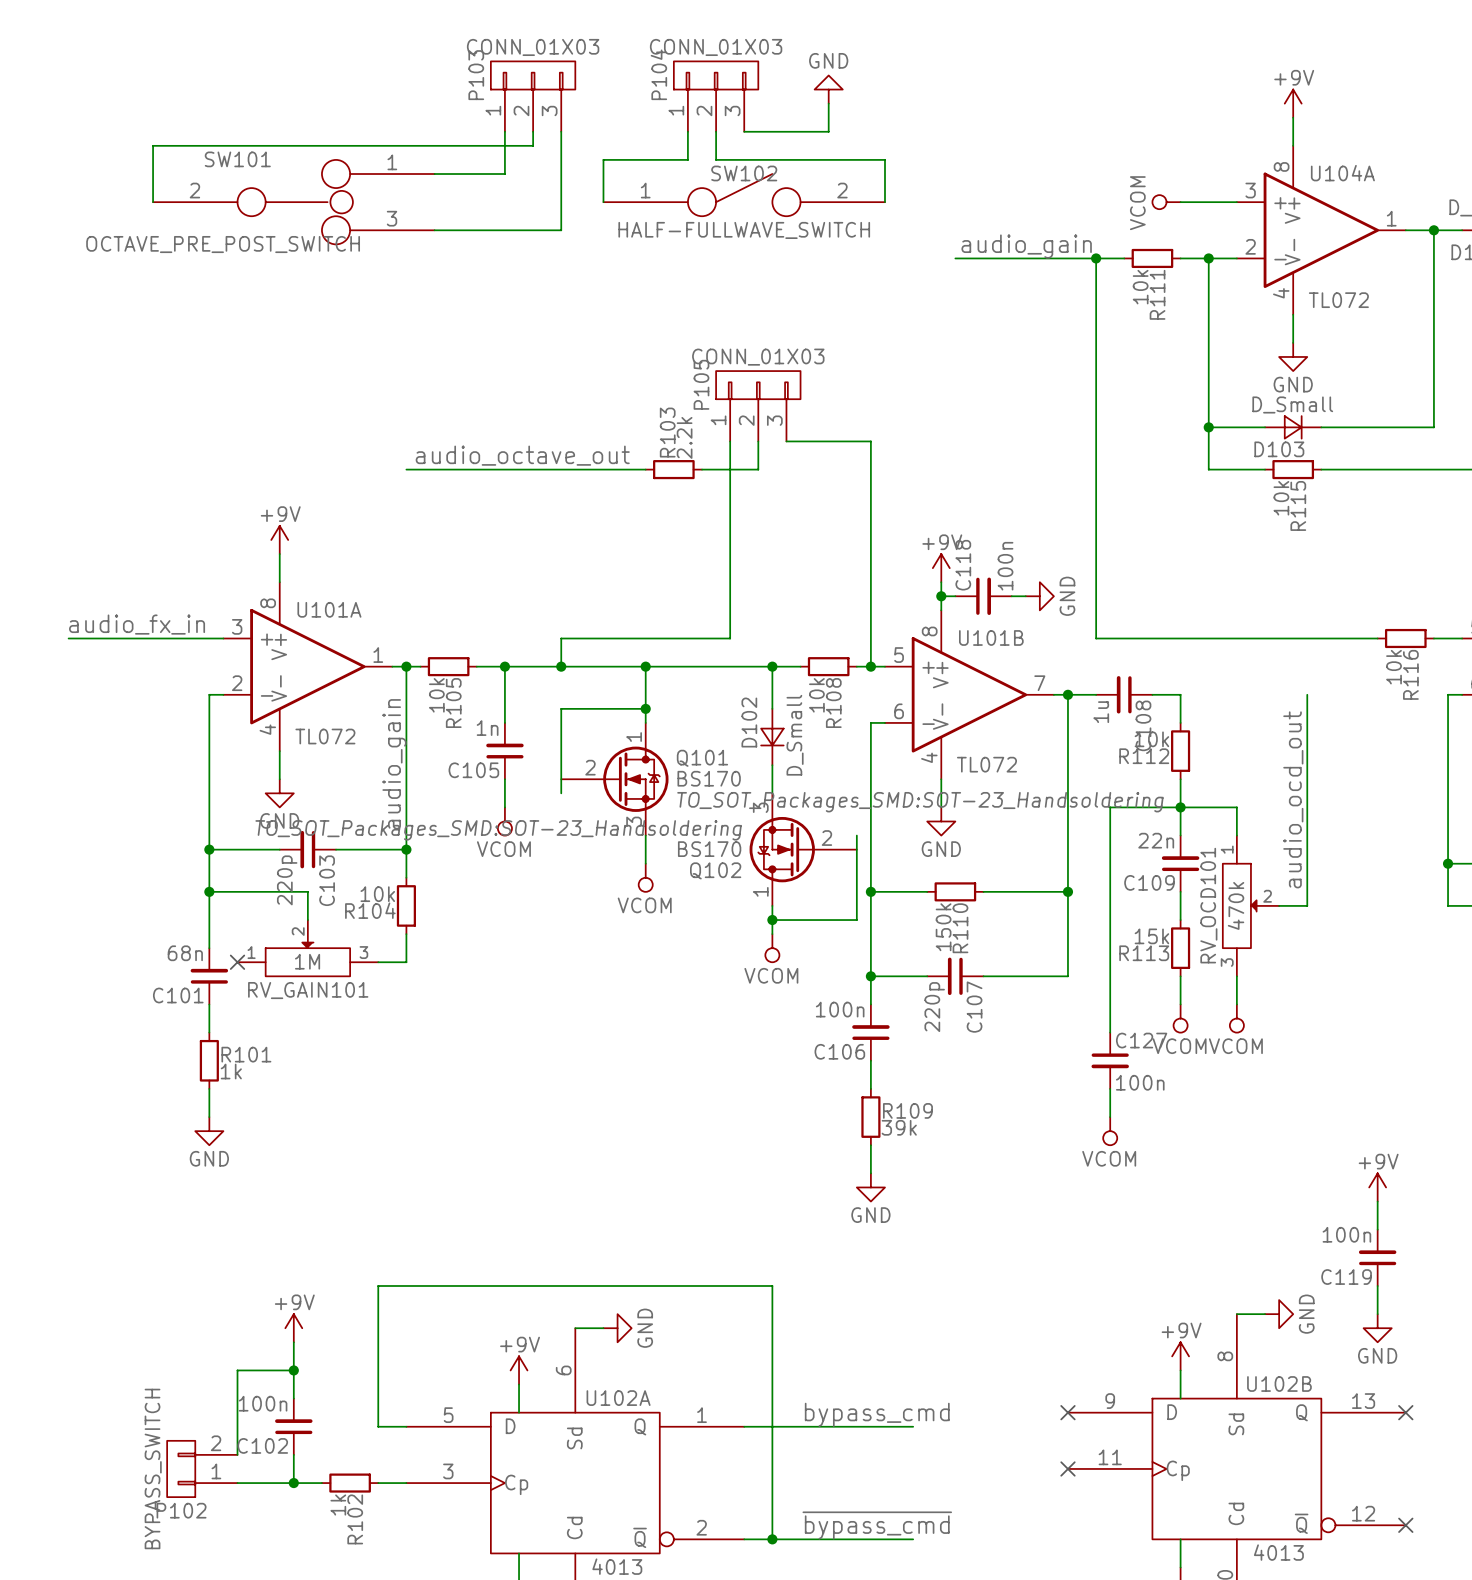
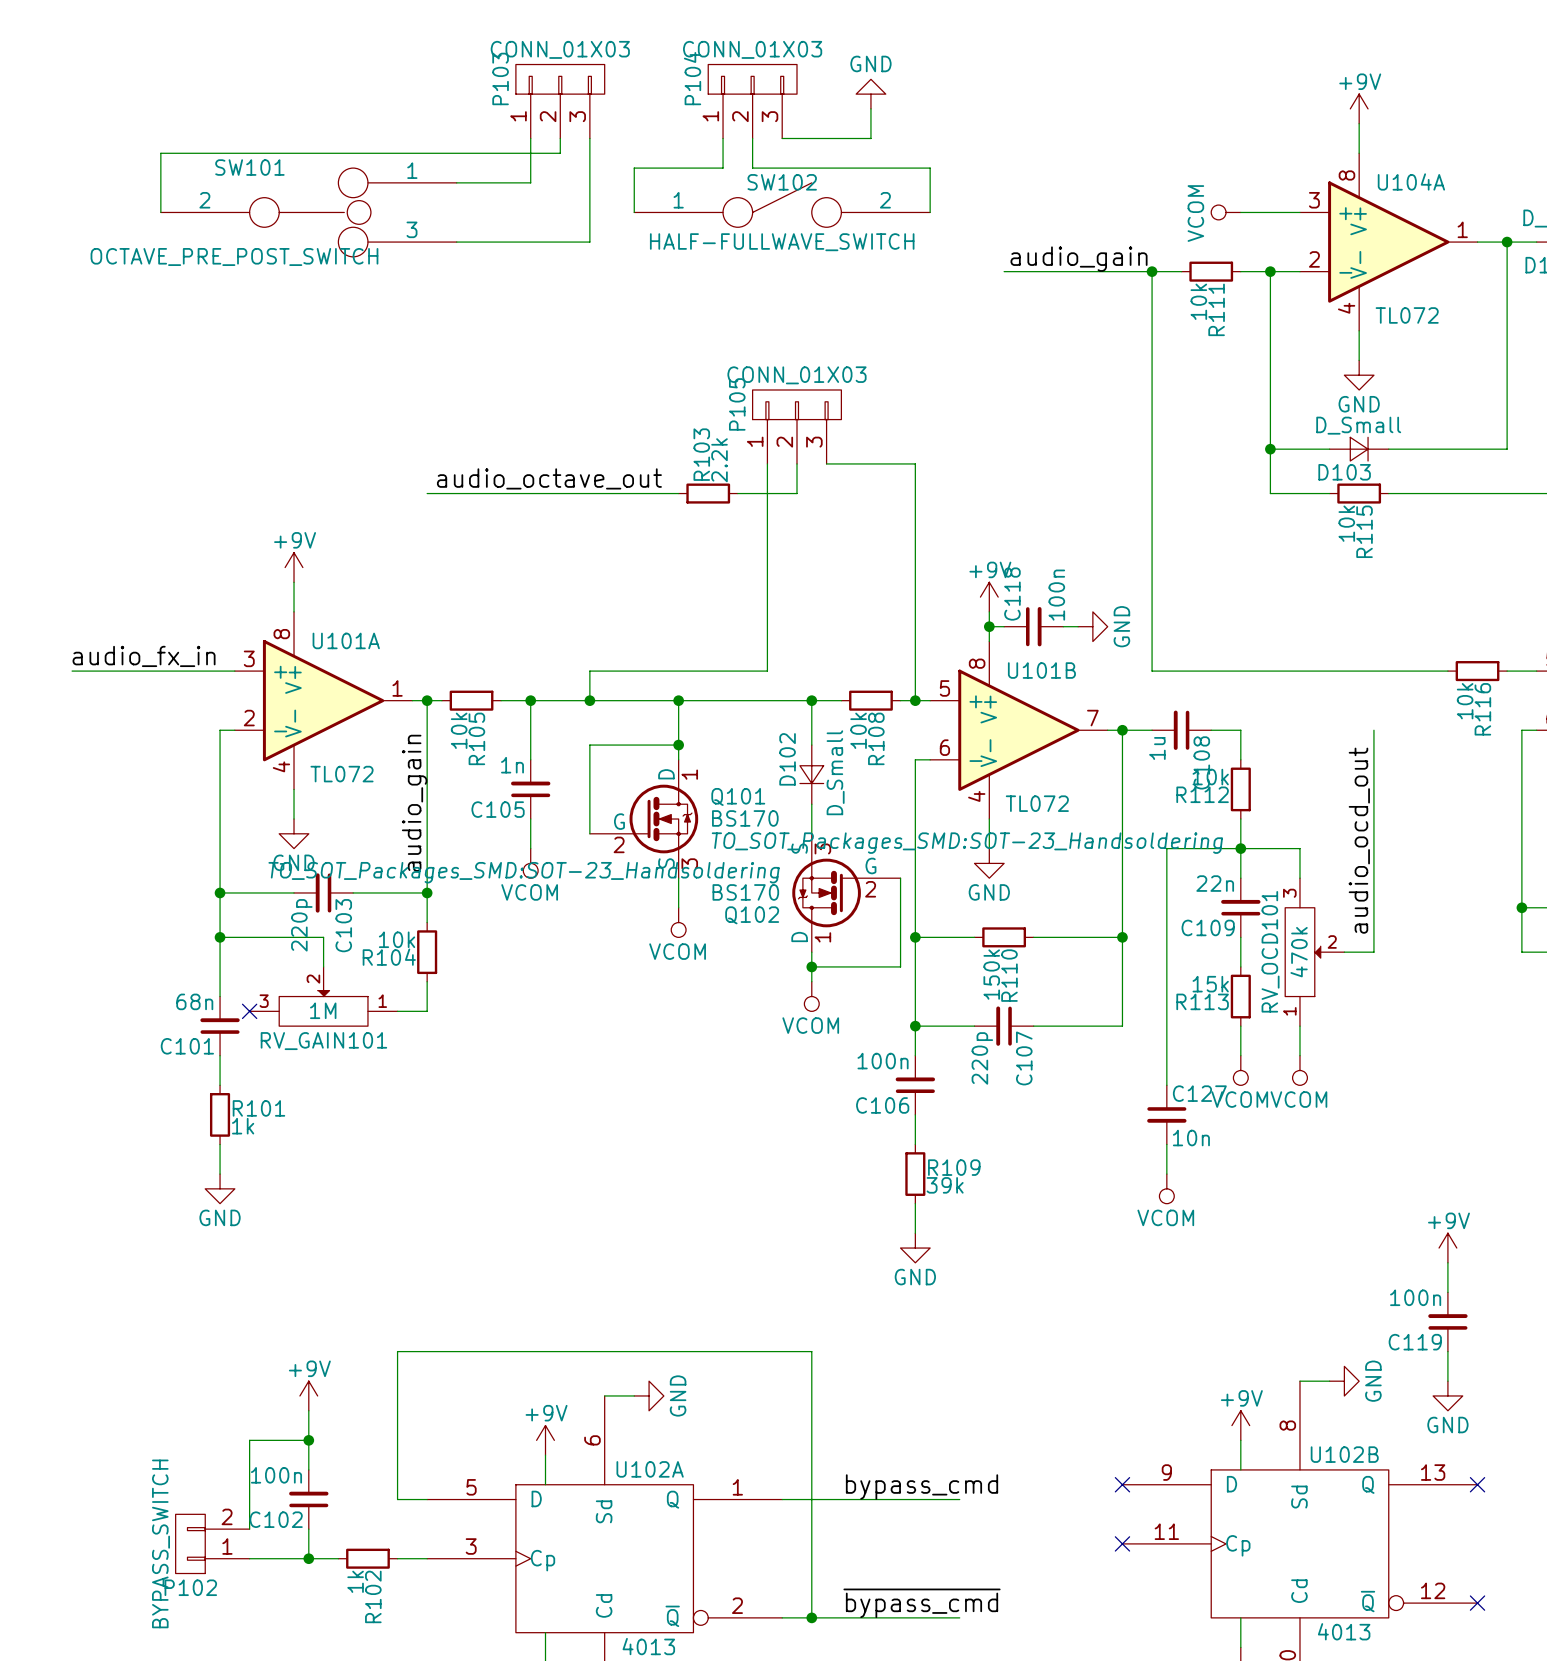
Q101 symbol: [561, 722, 669, 836] -> [589, 759, 699, 879]
Q102 symbol: [749, 793, 857, 906] -> [792, 833, 901, 953]
RV_OCD101 flip: as is (1239, 905) -> up-down (1302, 952)
RV_GAIN101 flip: as is (307, 959) -> left-right (323, 1008)
C127 value: 100n (1140, 1082) -> 10n (1191, 1138)

